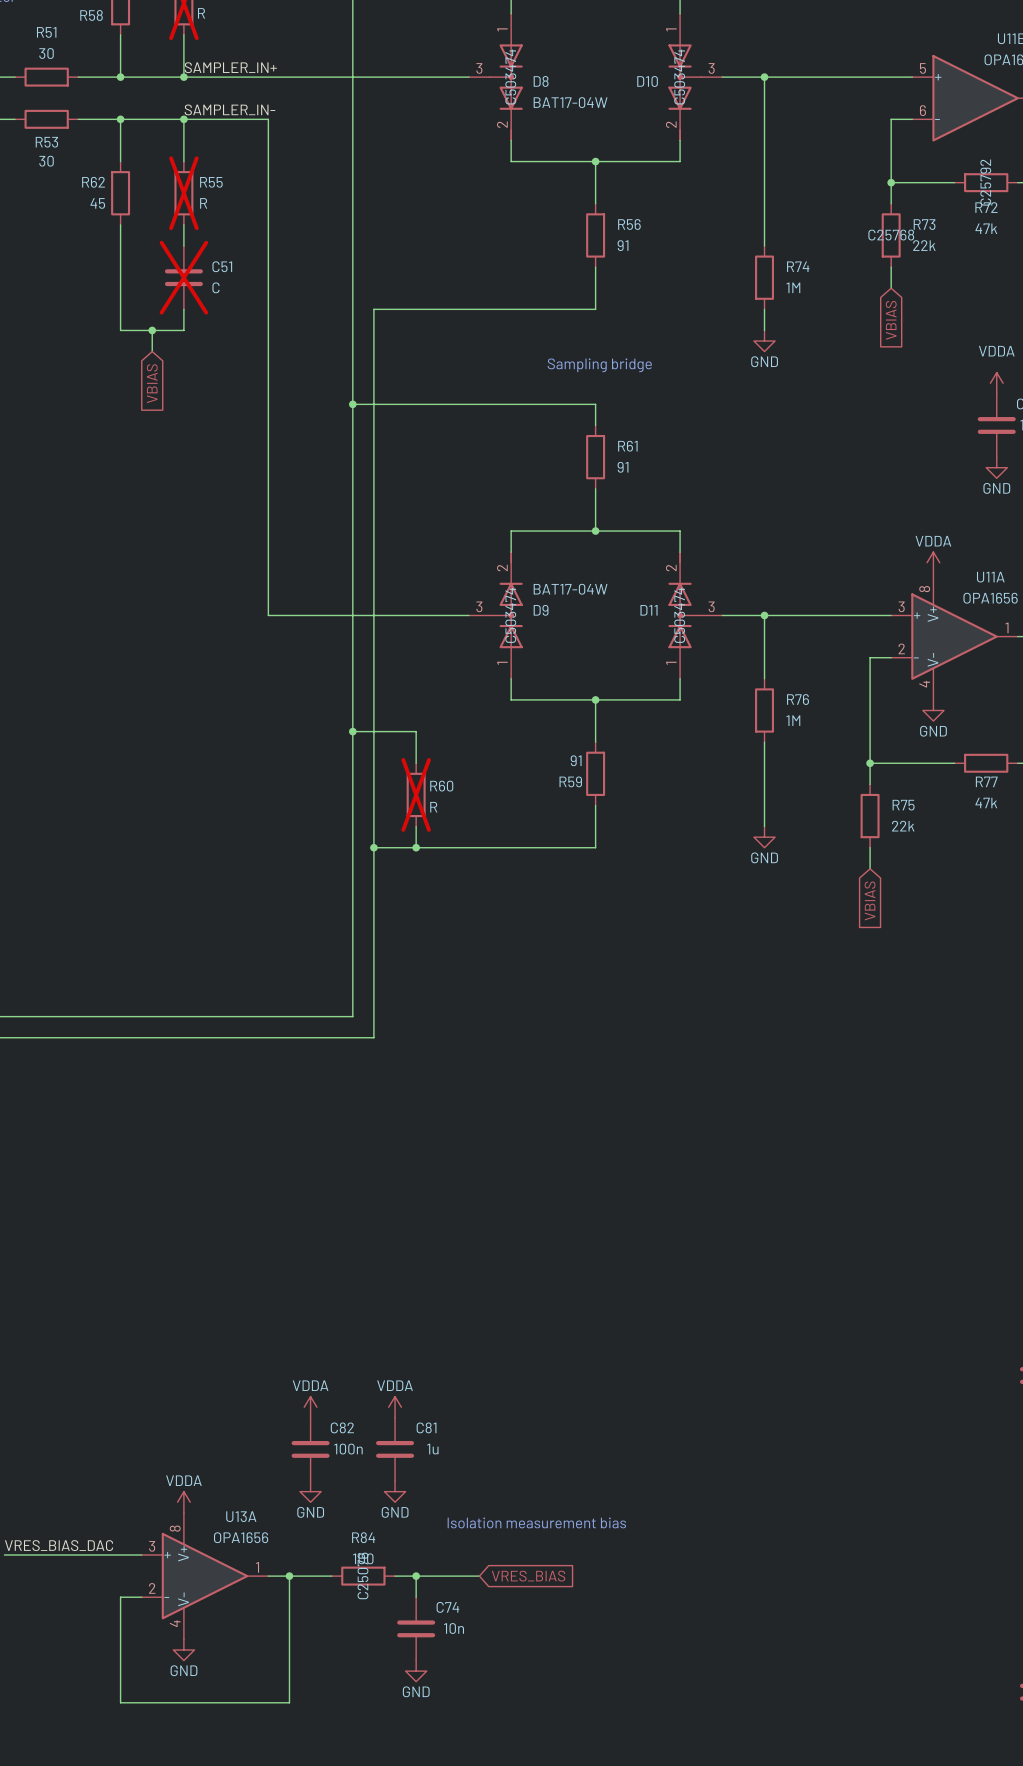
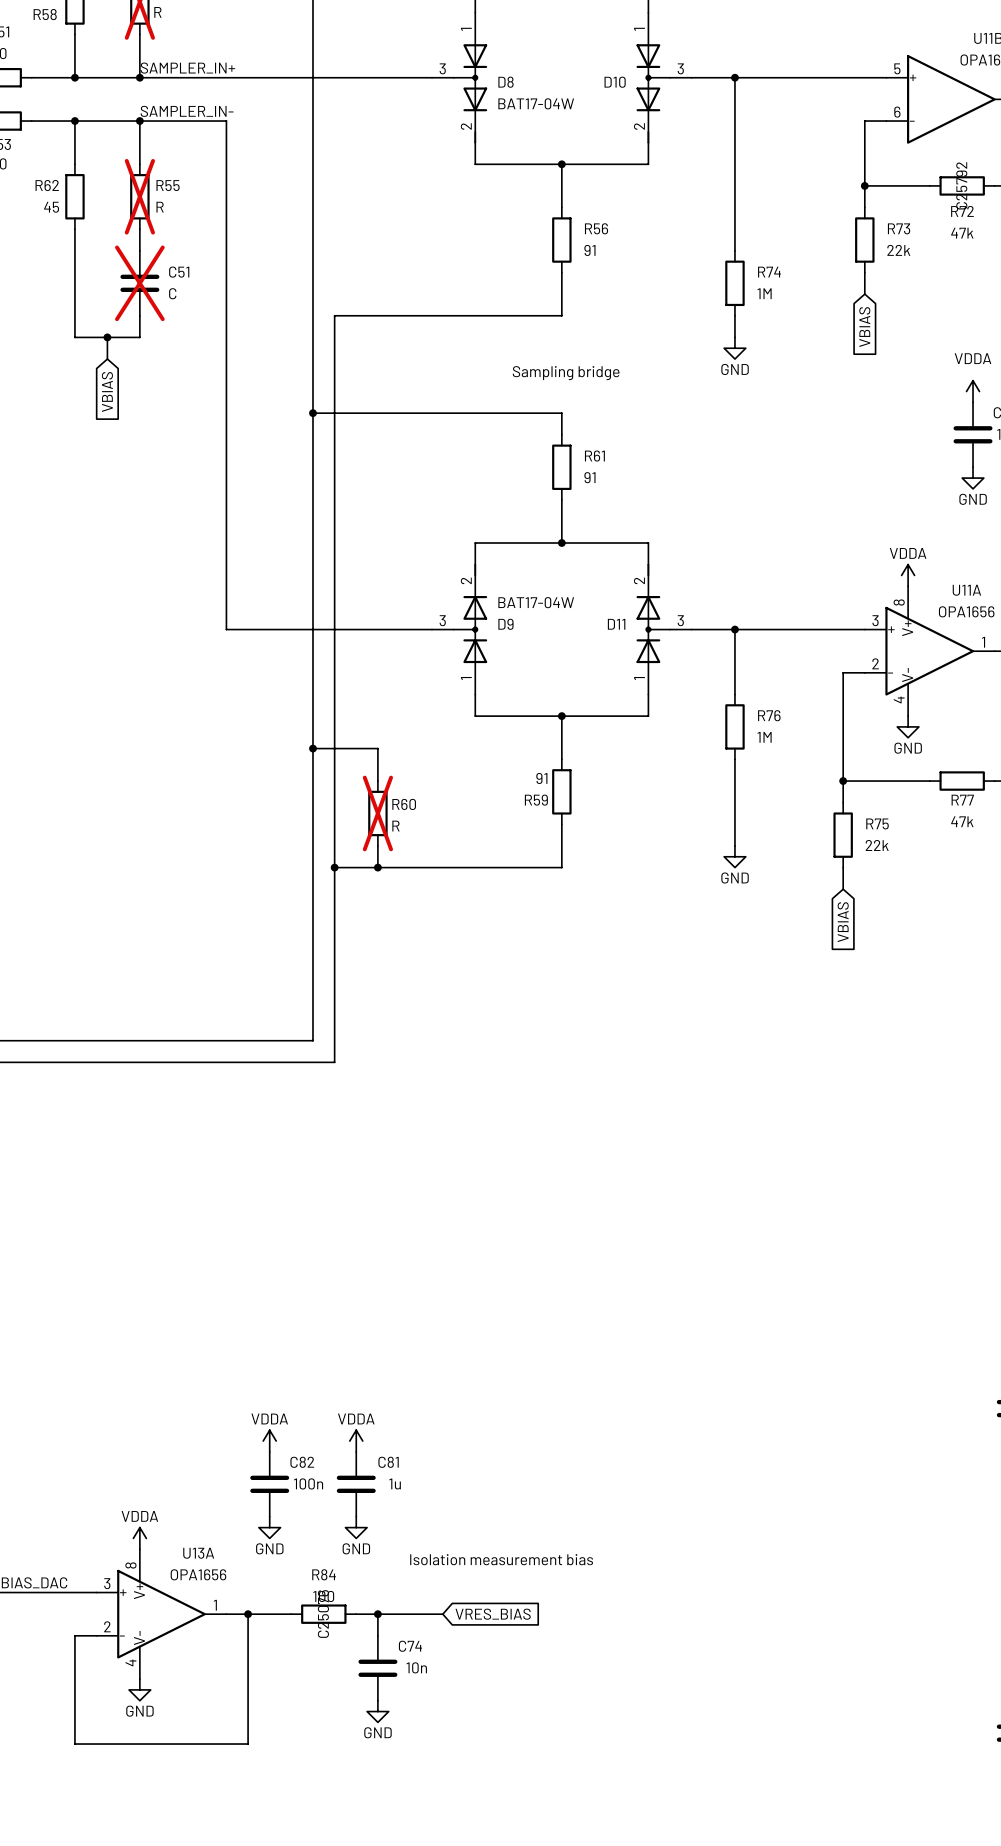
D8 text: C503474 (510, 77) -> none
D10 text: C503474 (679, 77) -> none
R73 text: C25768 (891, 235) -> none
D9 text: C503474 (510, 615) -> none
D11 text: C503474 (679, 615) -> none

